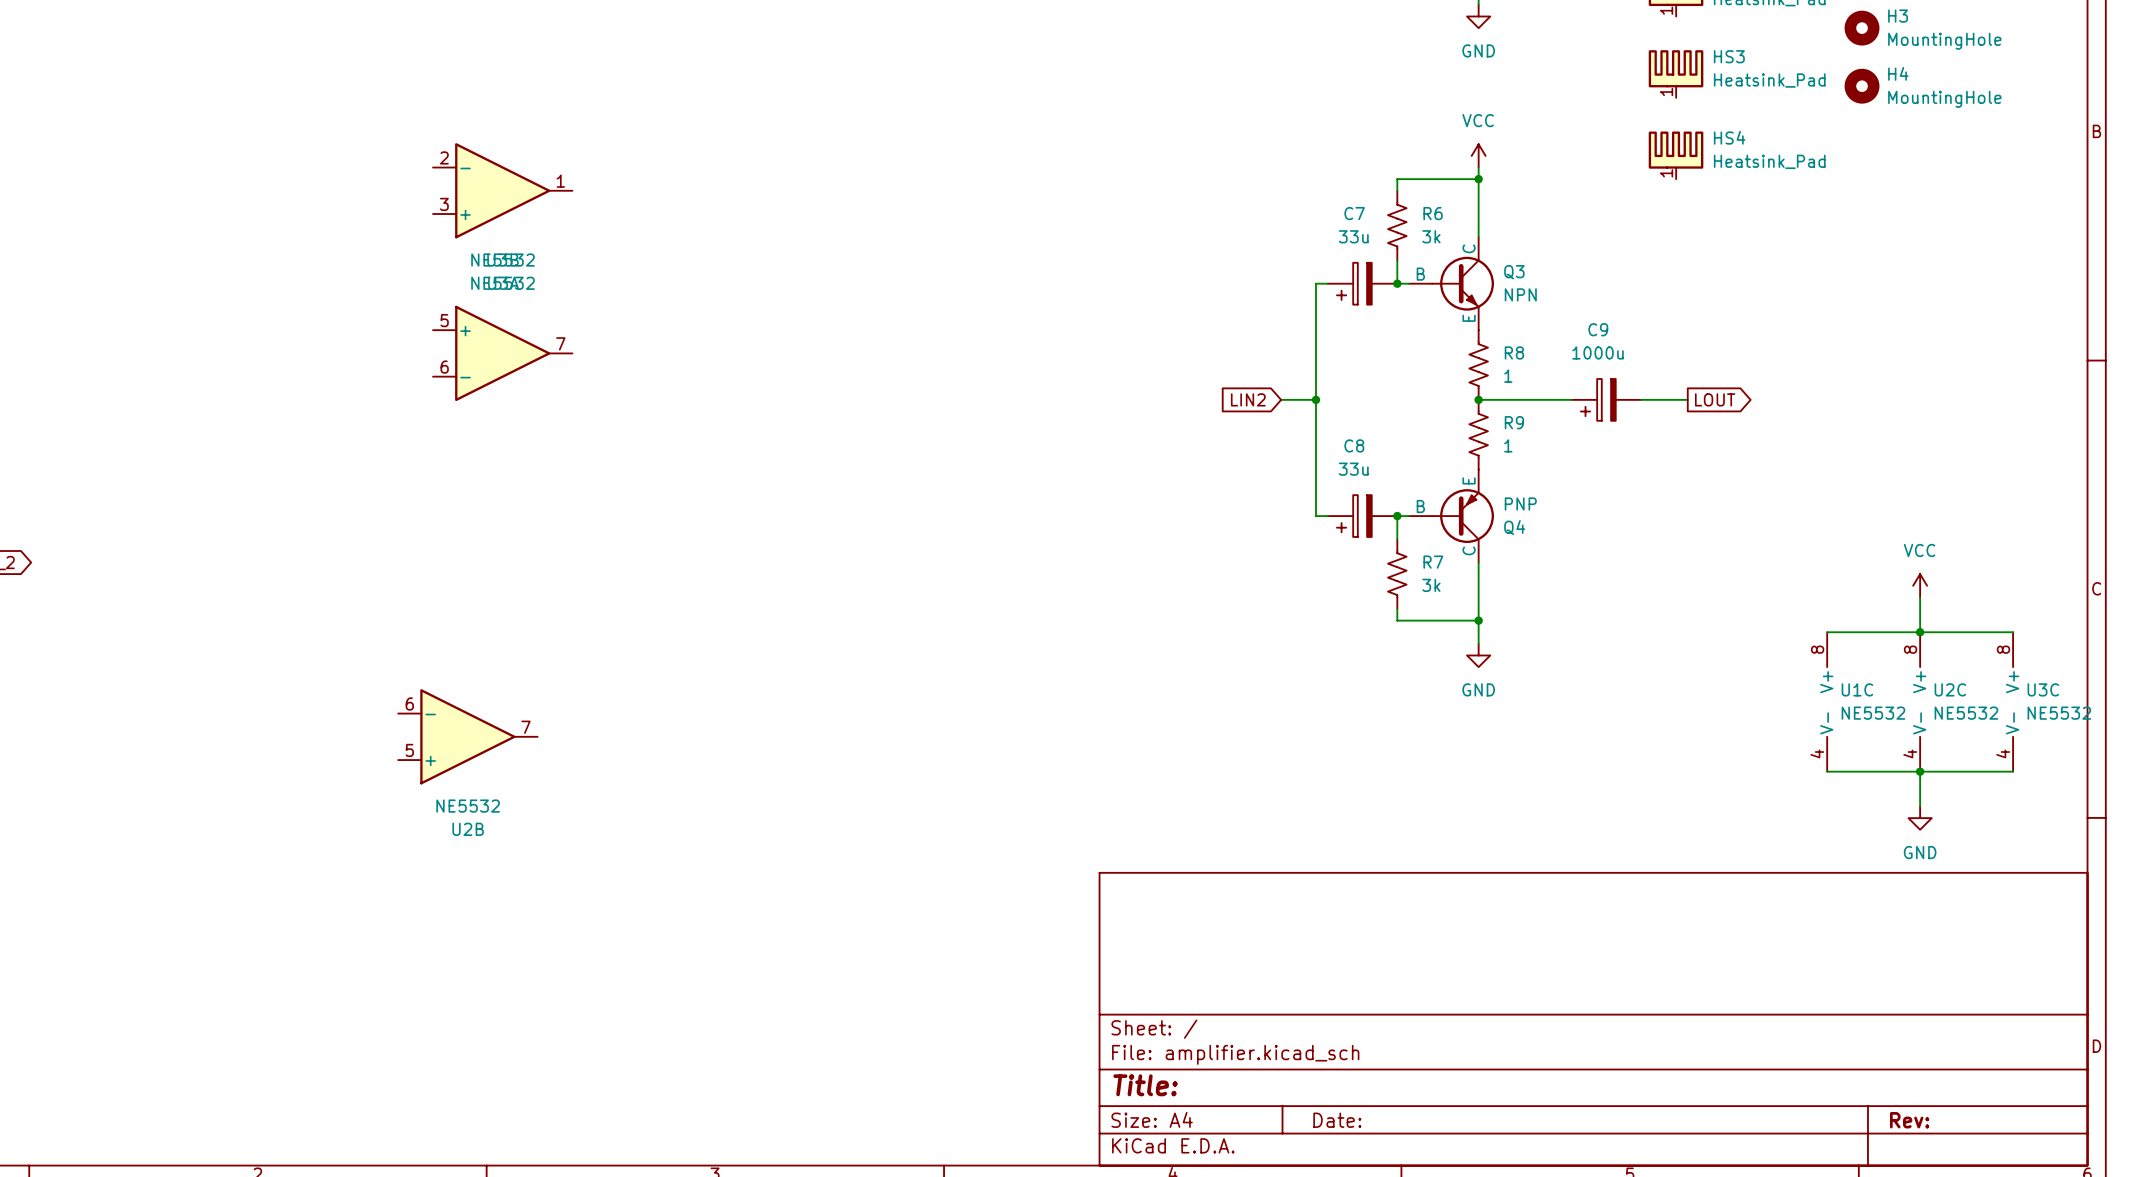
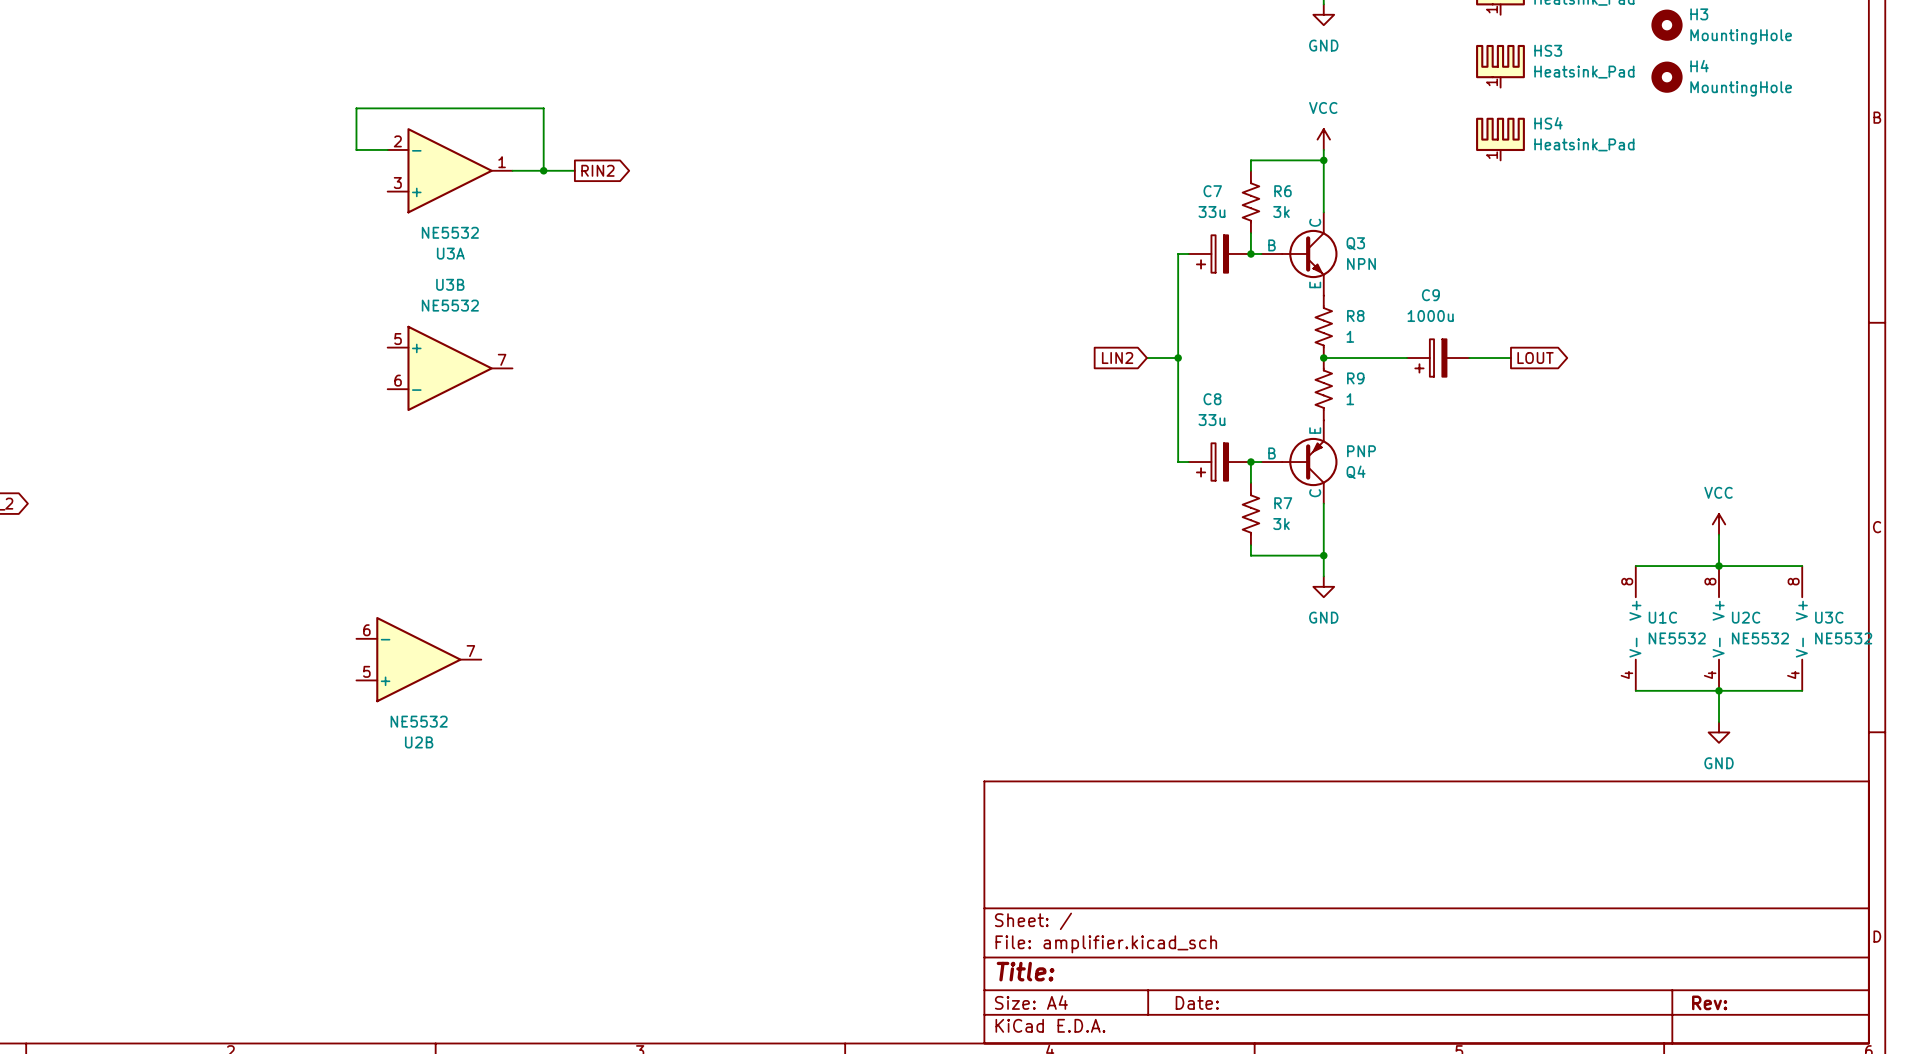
wire: none -> (387, 149) (356, 149) (356, 108) (543, 108) (543, 170)
wire: none -> (512, 170) (574, 170)
junction: none -> (543, 170)
global label: none -> RIN2 (597, 170)
U3B position: (502, 353) -> (450, 368)

